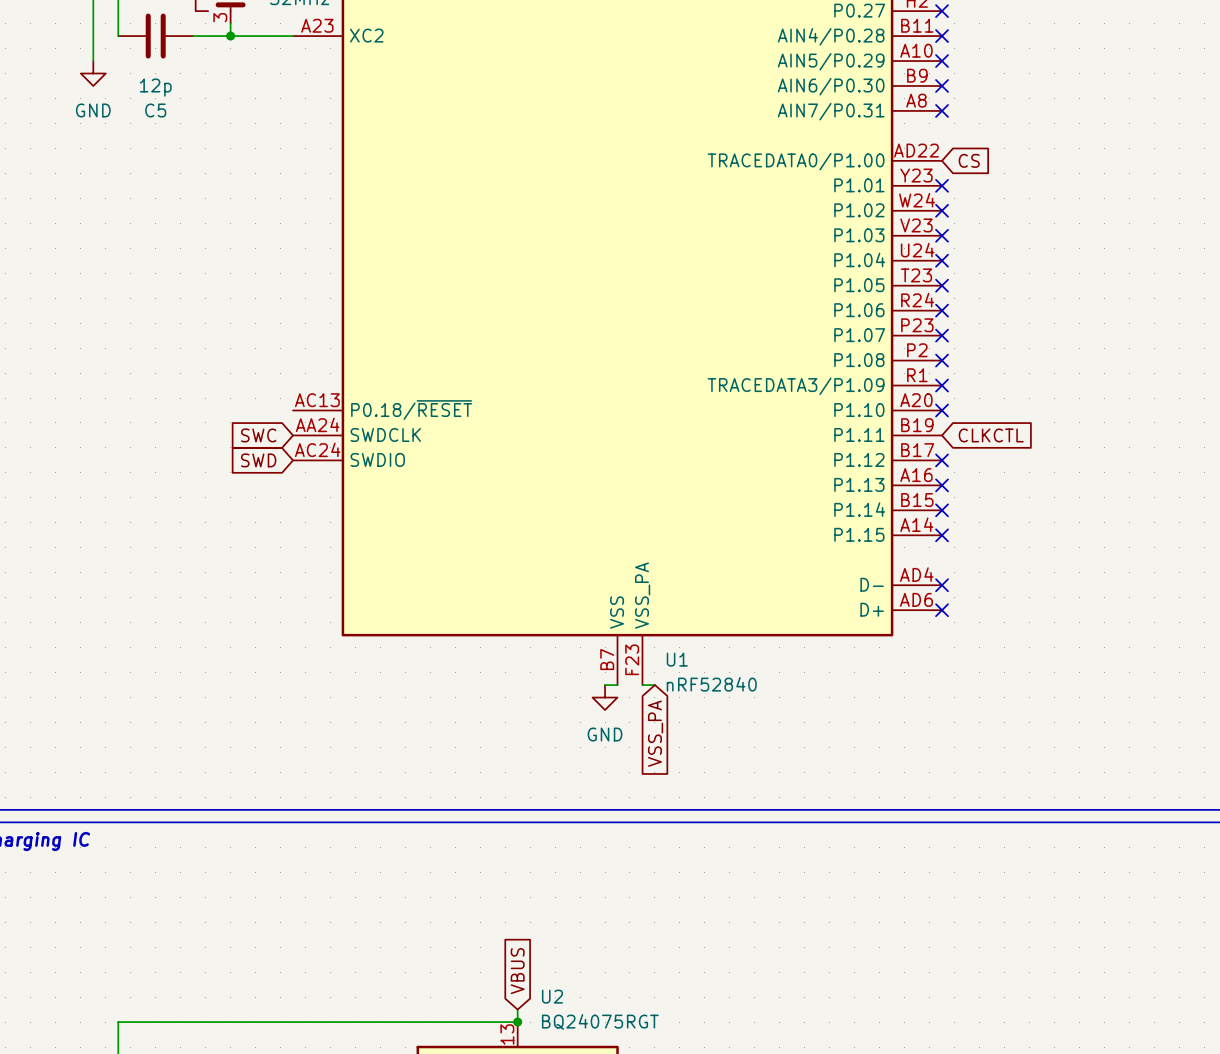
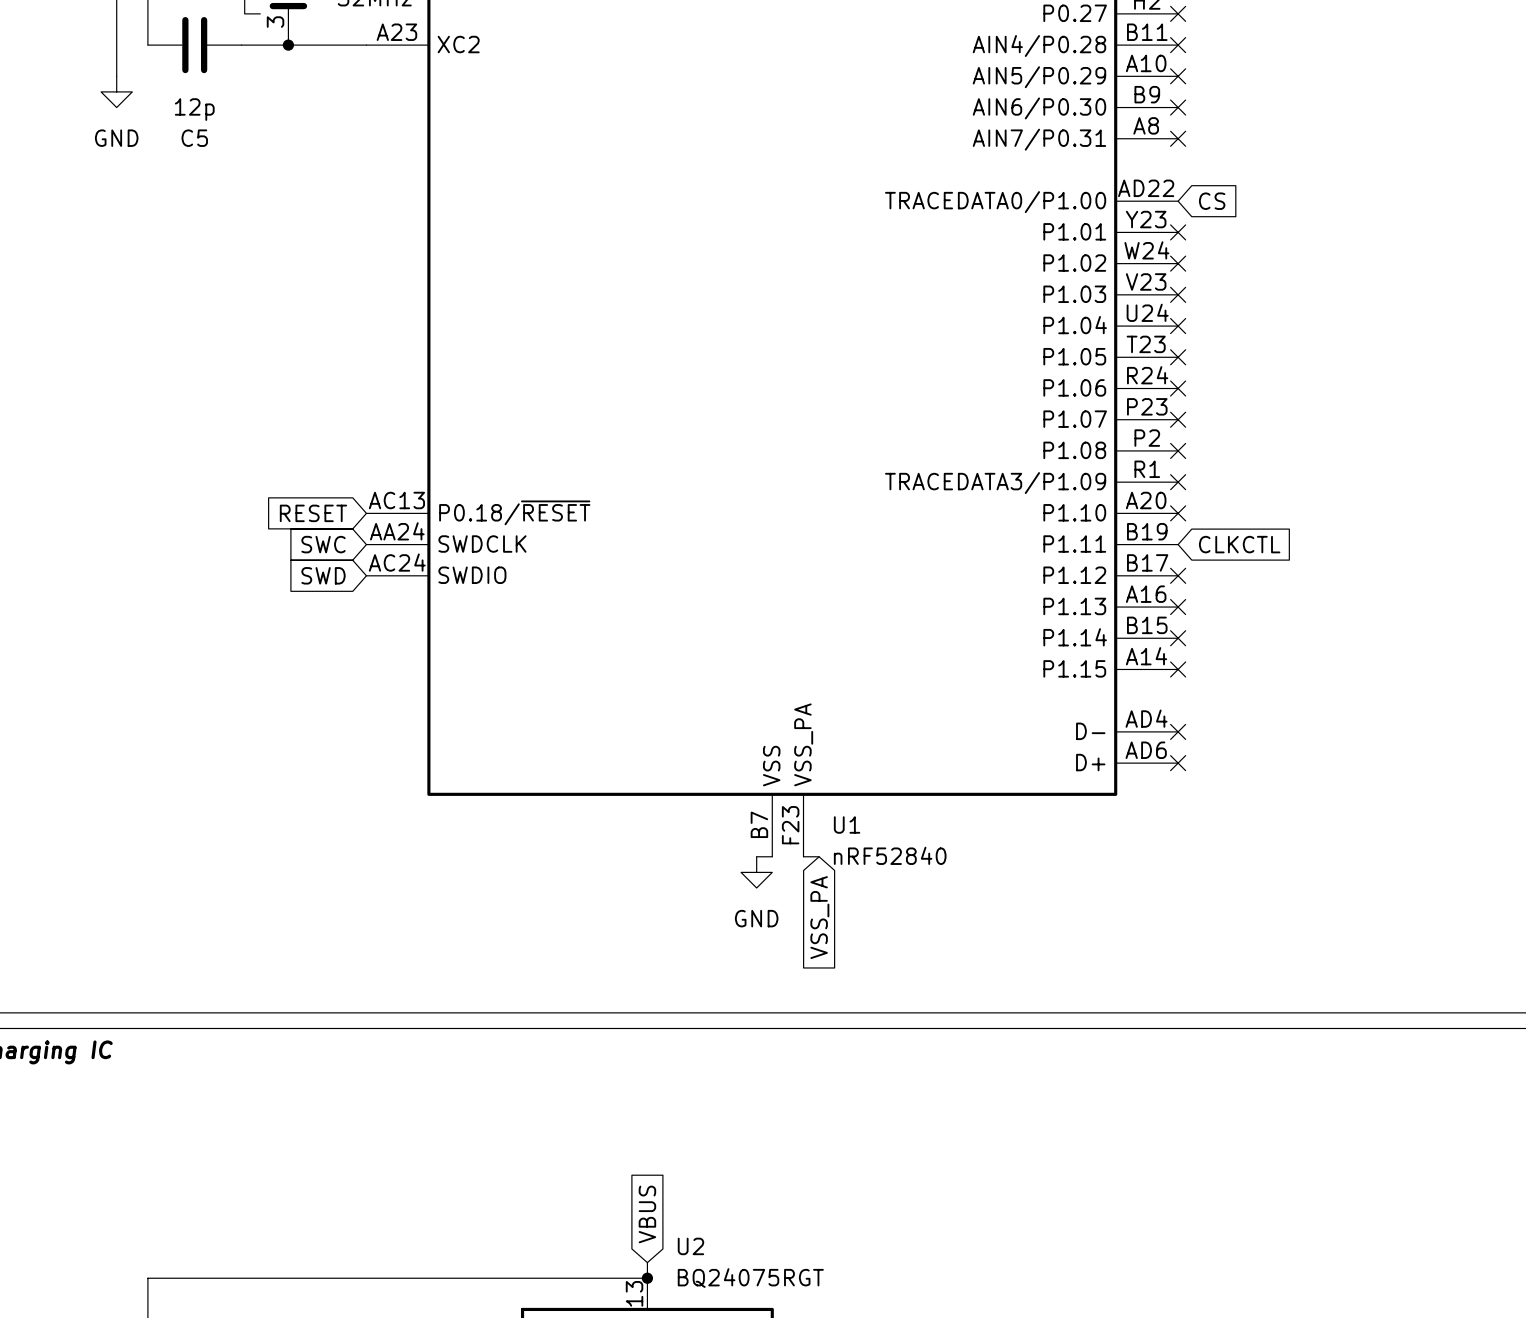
global label: none -> RESET (313, 513)

